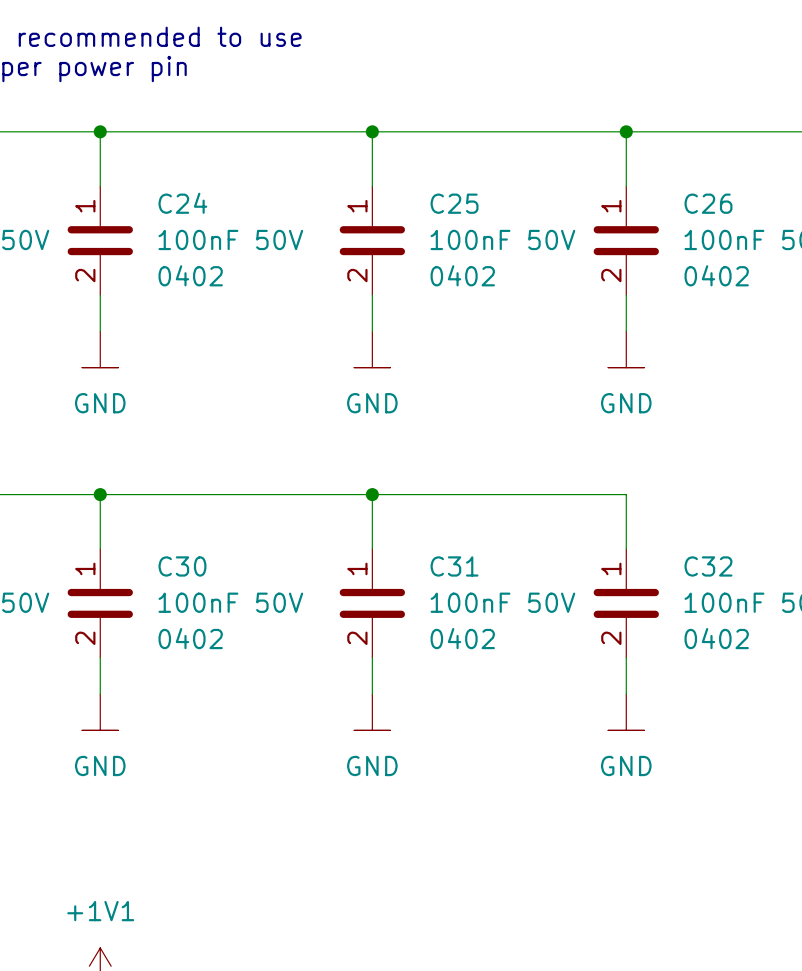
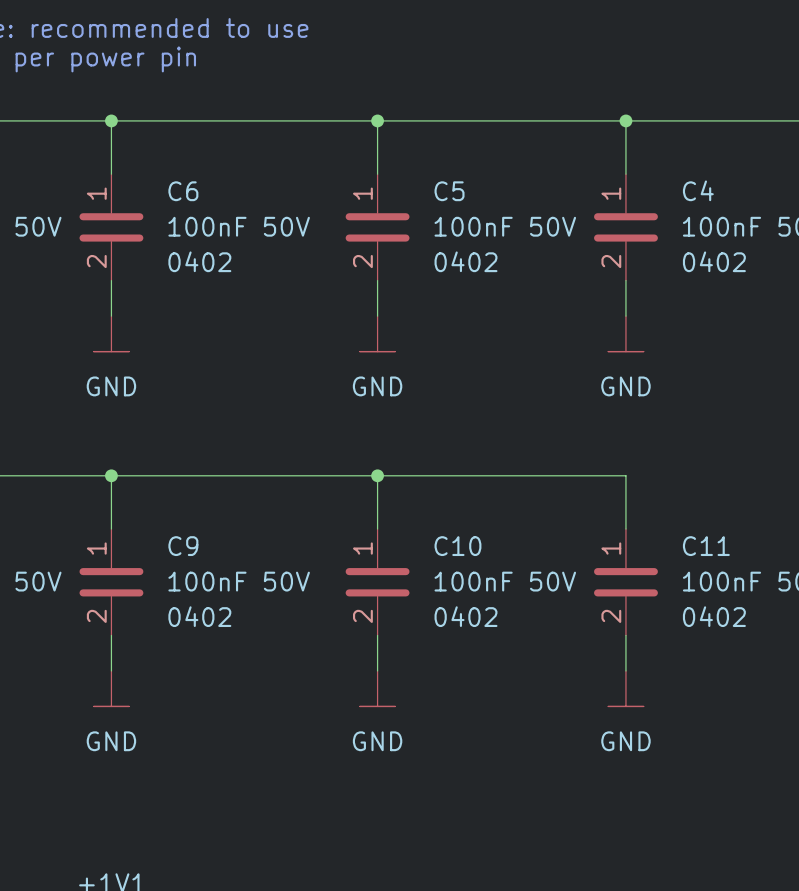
C24 name: C24 (182, 203) -> C6 (183, 191)
C25 name: C25 (454, 203) -> C5 (449, 191)
C26 name: C26 (708, 203) -> C4 (698, 190)
C30 name: C30 (182, 566) -> C9 (183, 546)
C31 name: C31 (454, 566) -> C10 (457, 546)
C32 name: C32 (708, 566) -> C11 (706, 546)

